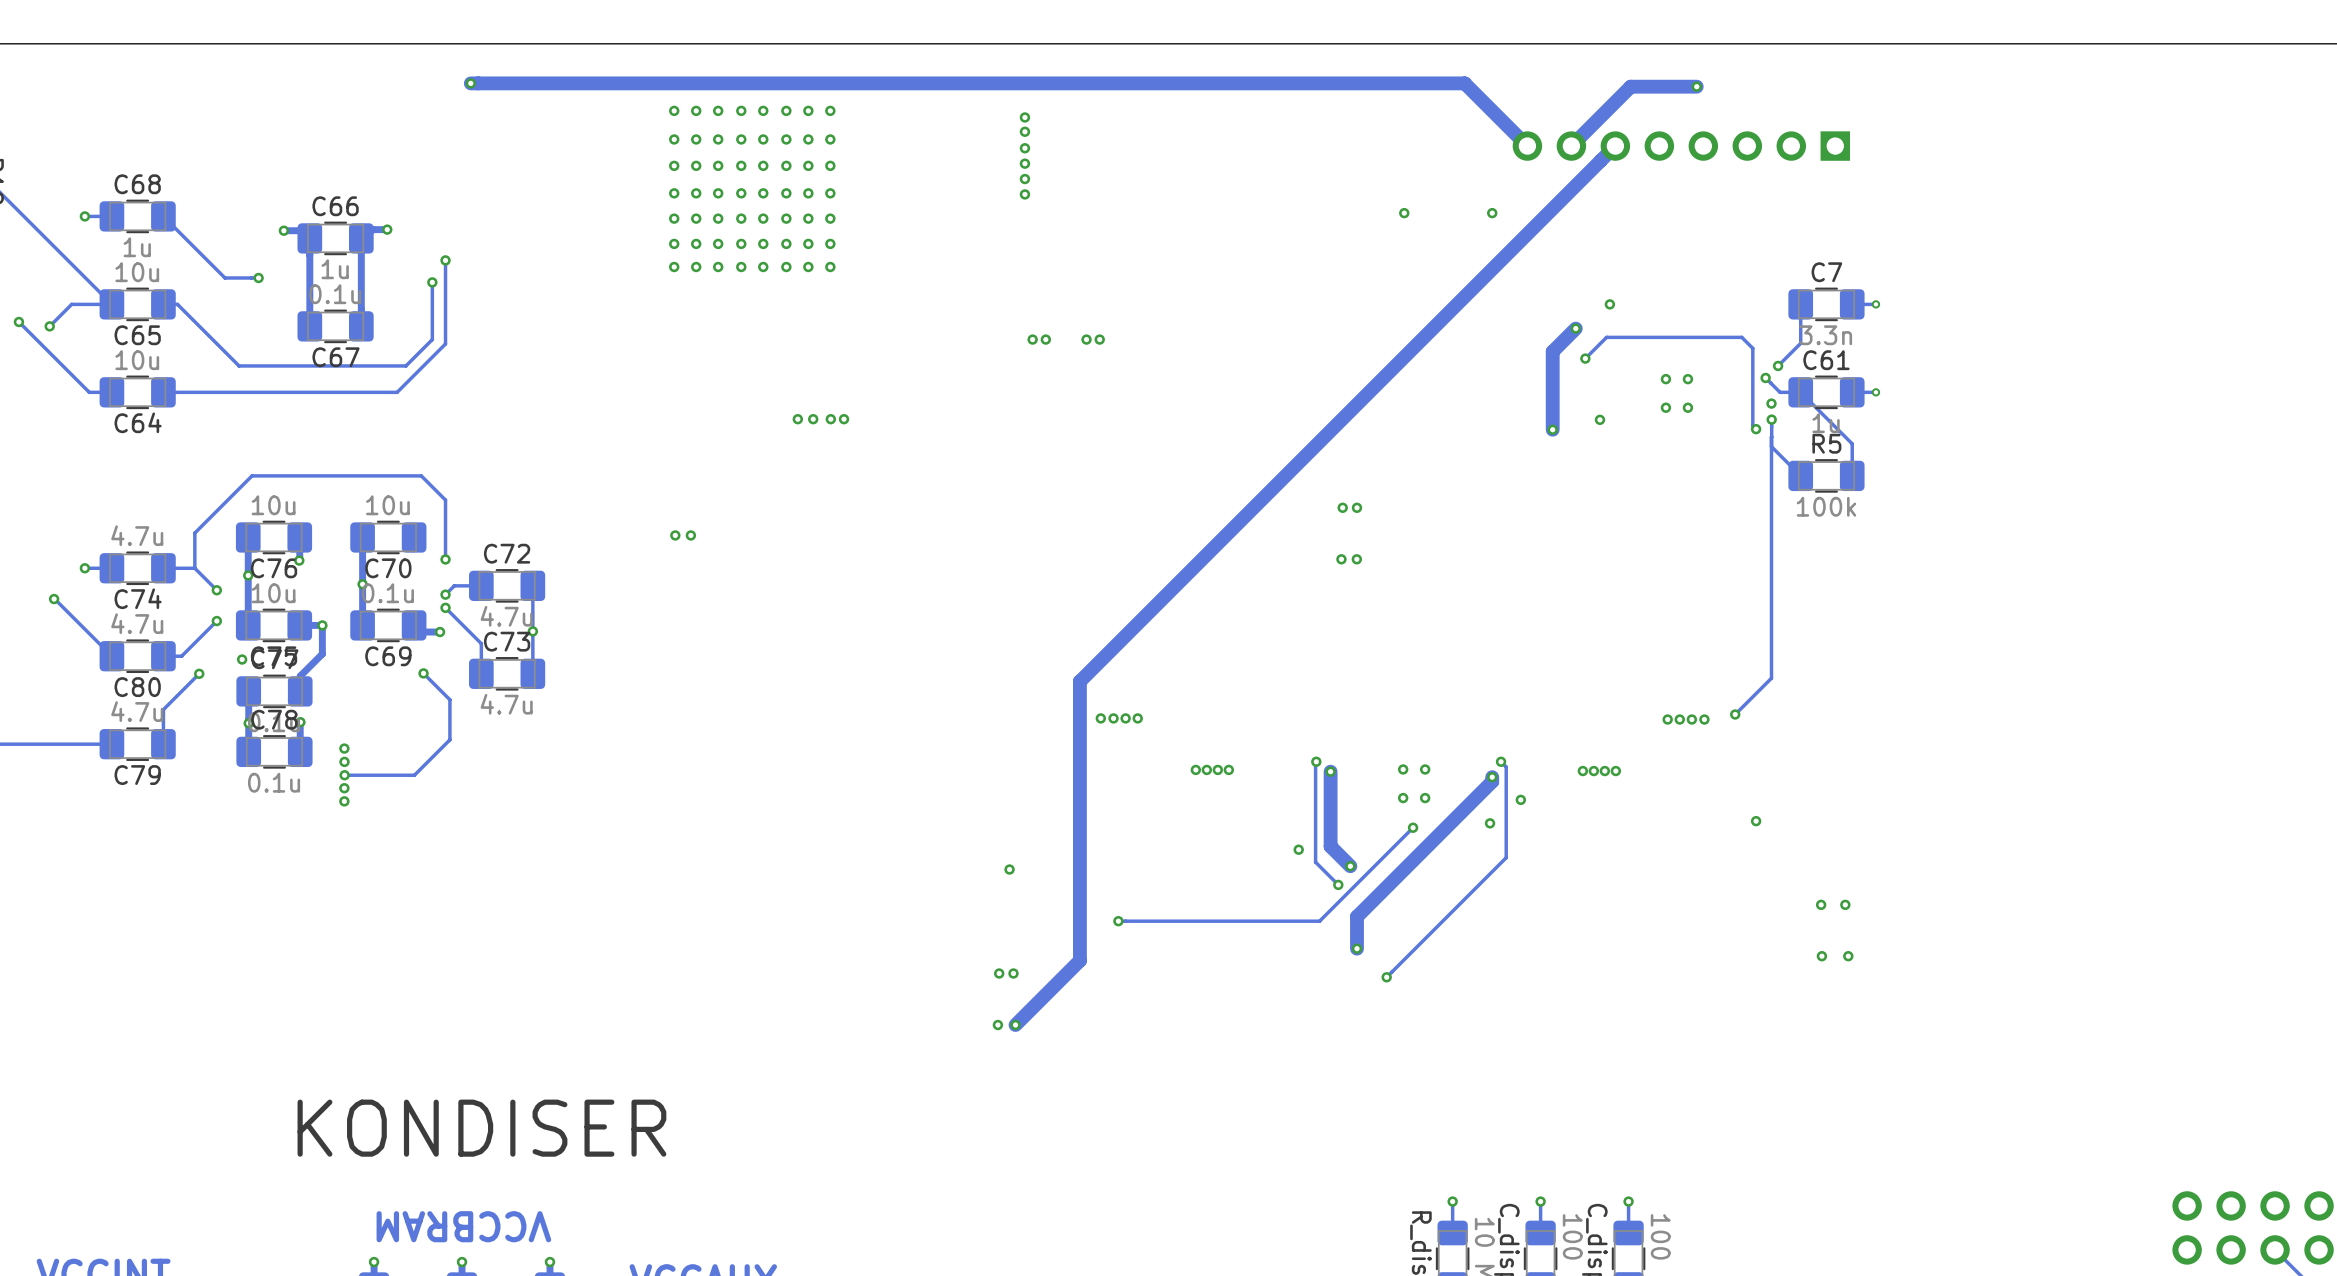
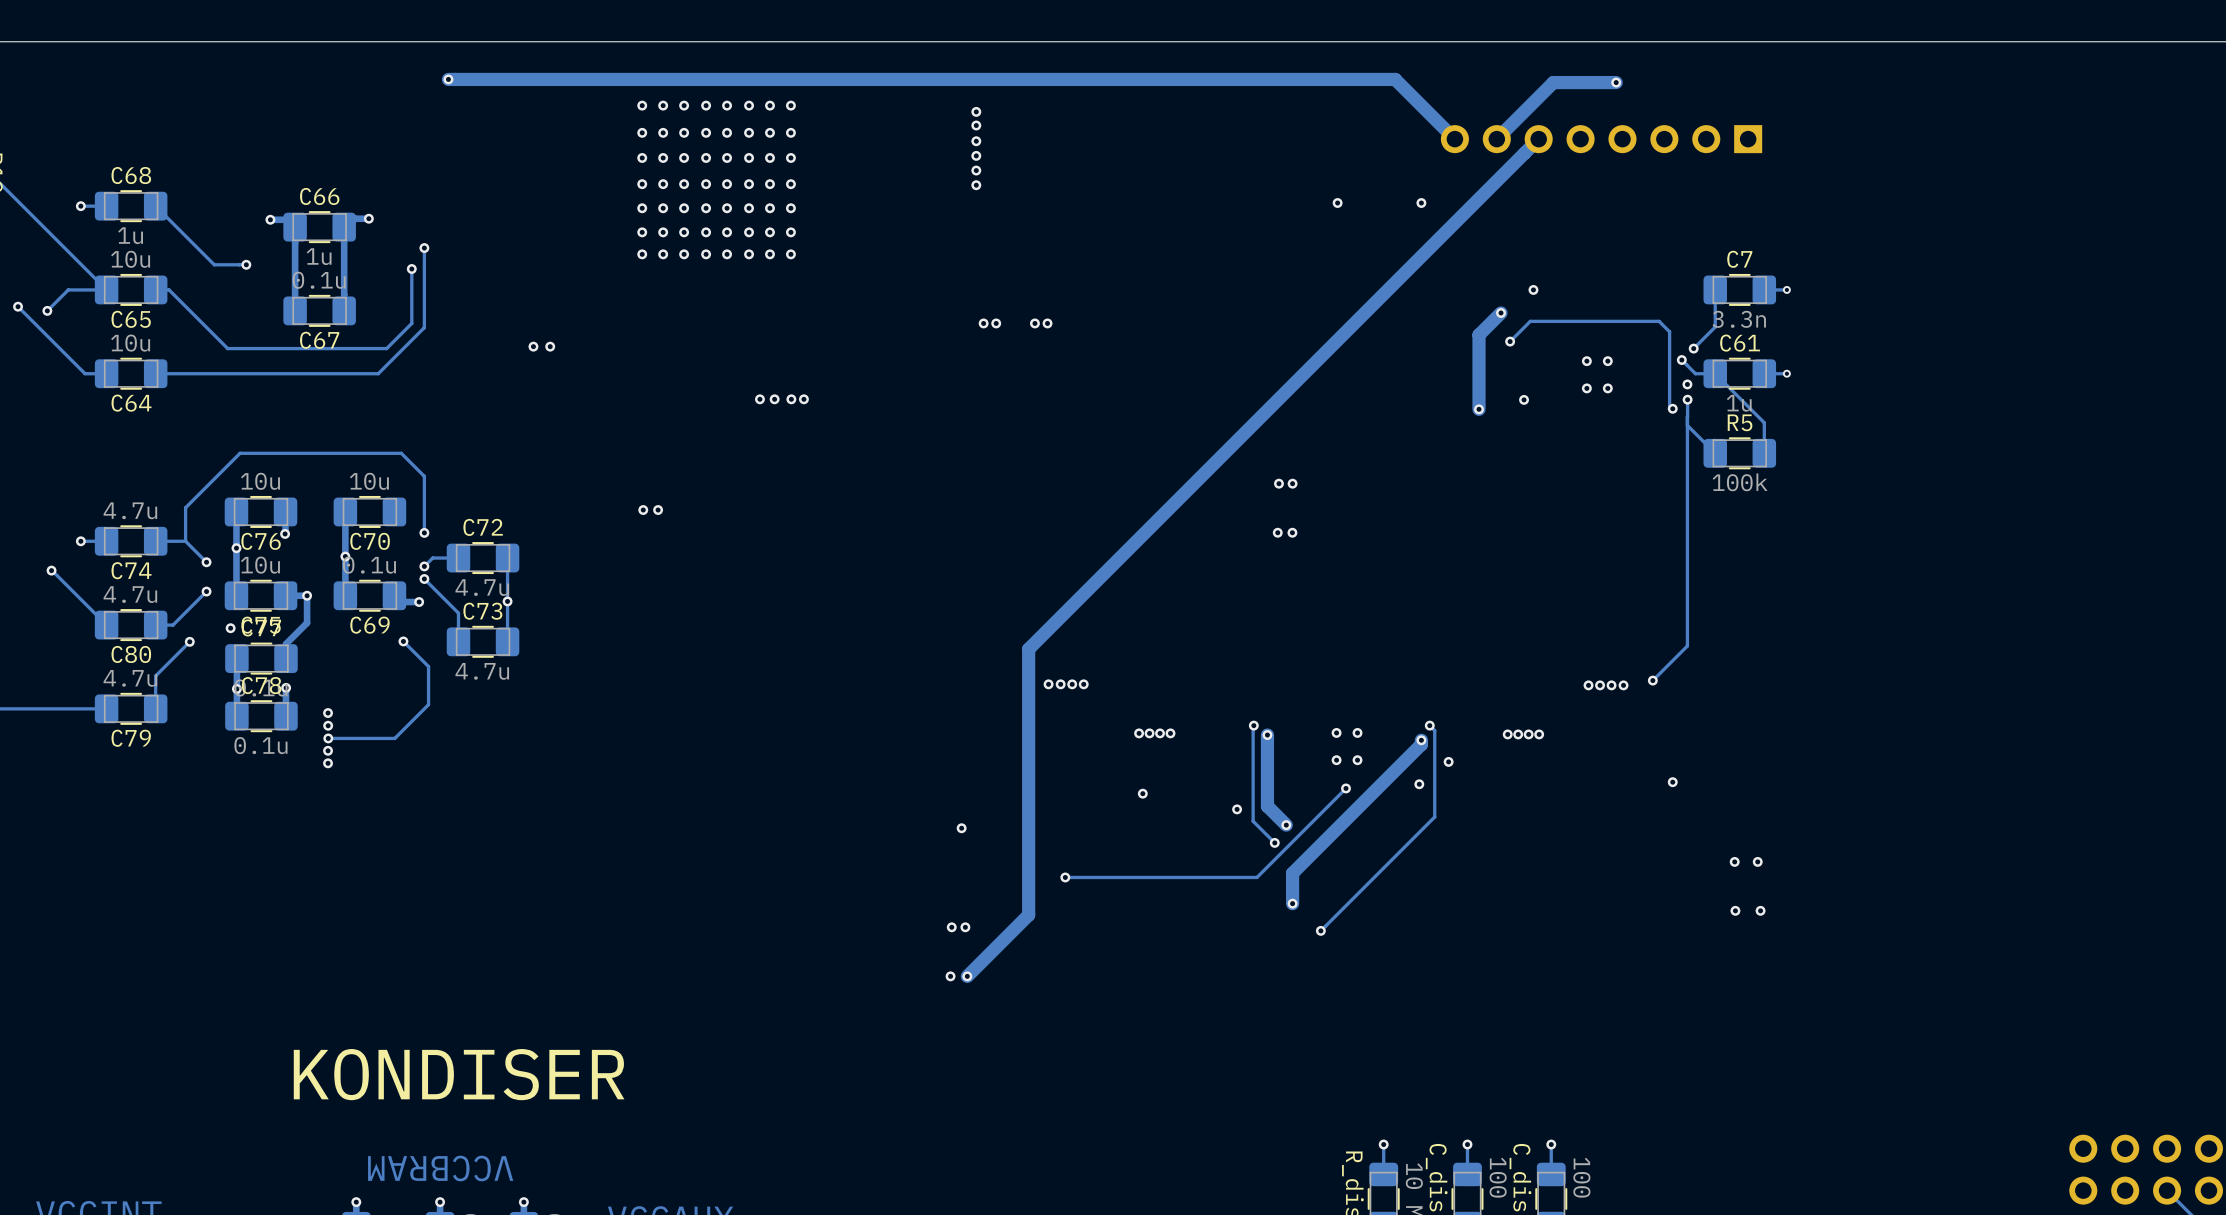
via: none -> (533, 346)
via: none -> (550, 346)
via: none -> (1142, 793)

